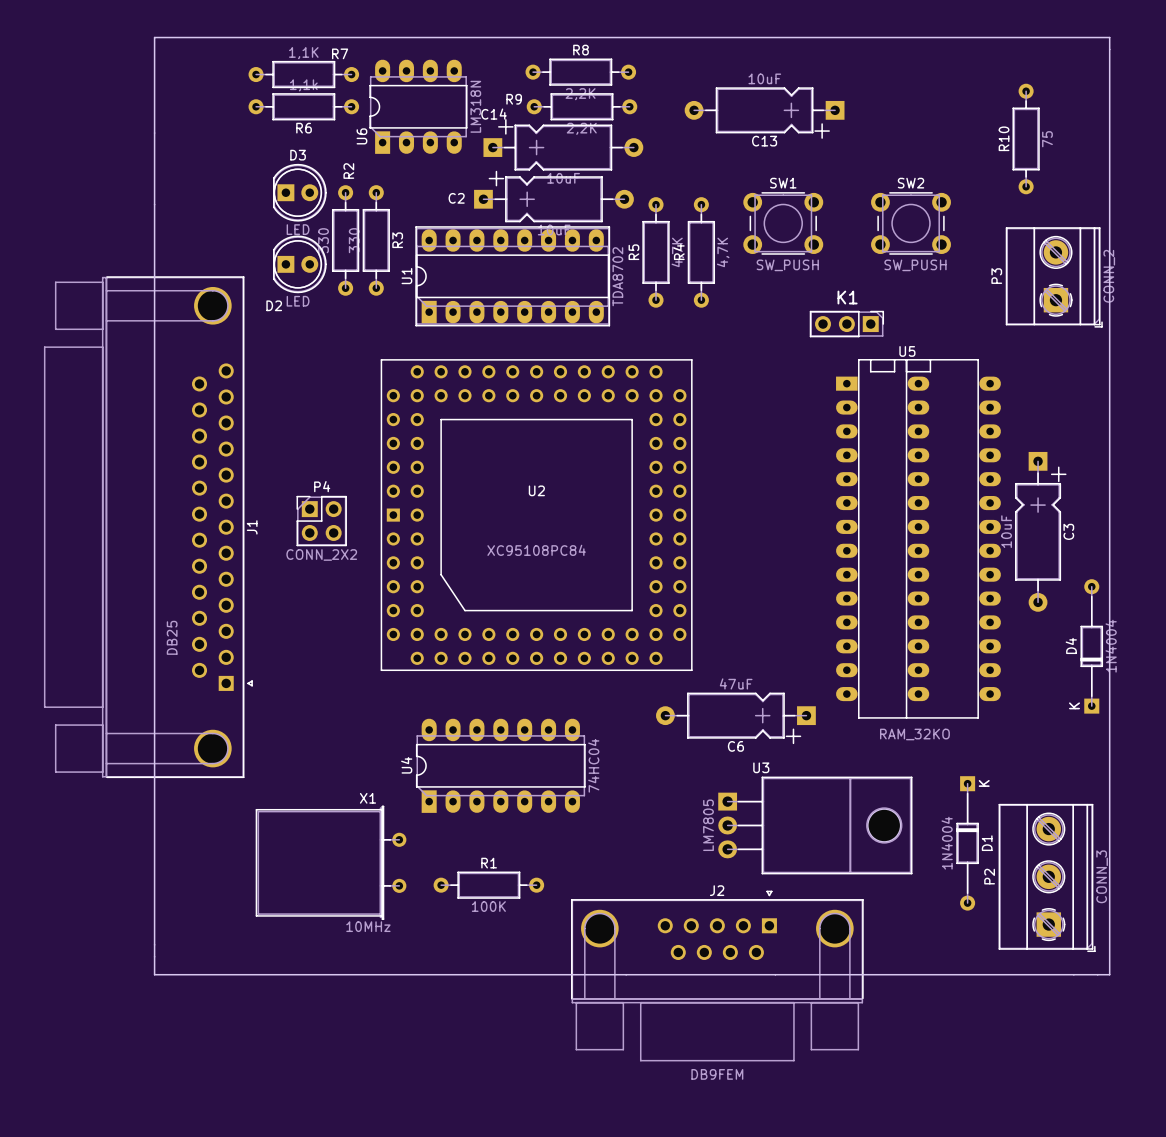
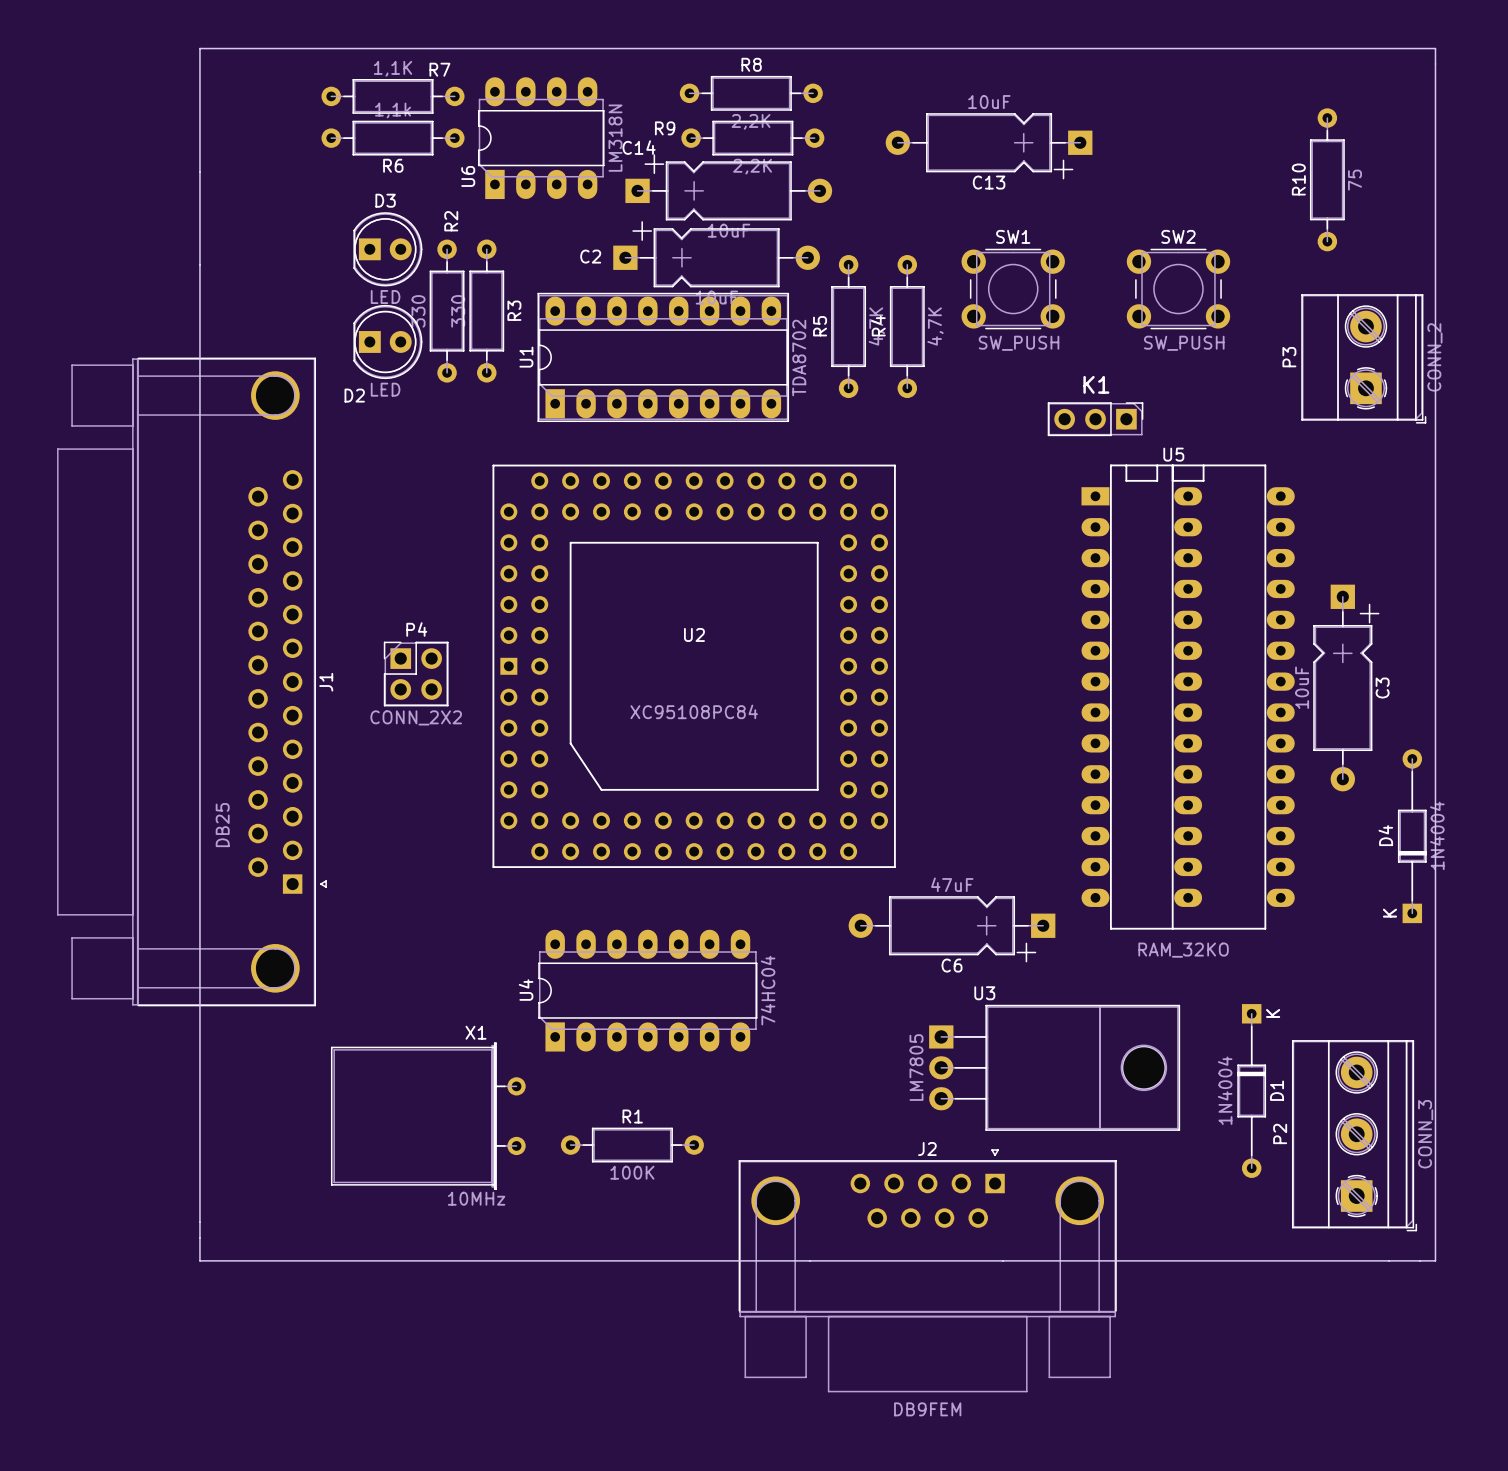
J2 footprint: [571, 890, 864, 1062] -> [738, 1149, 1117, 1393]

